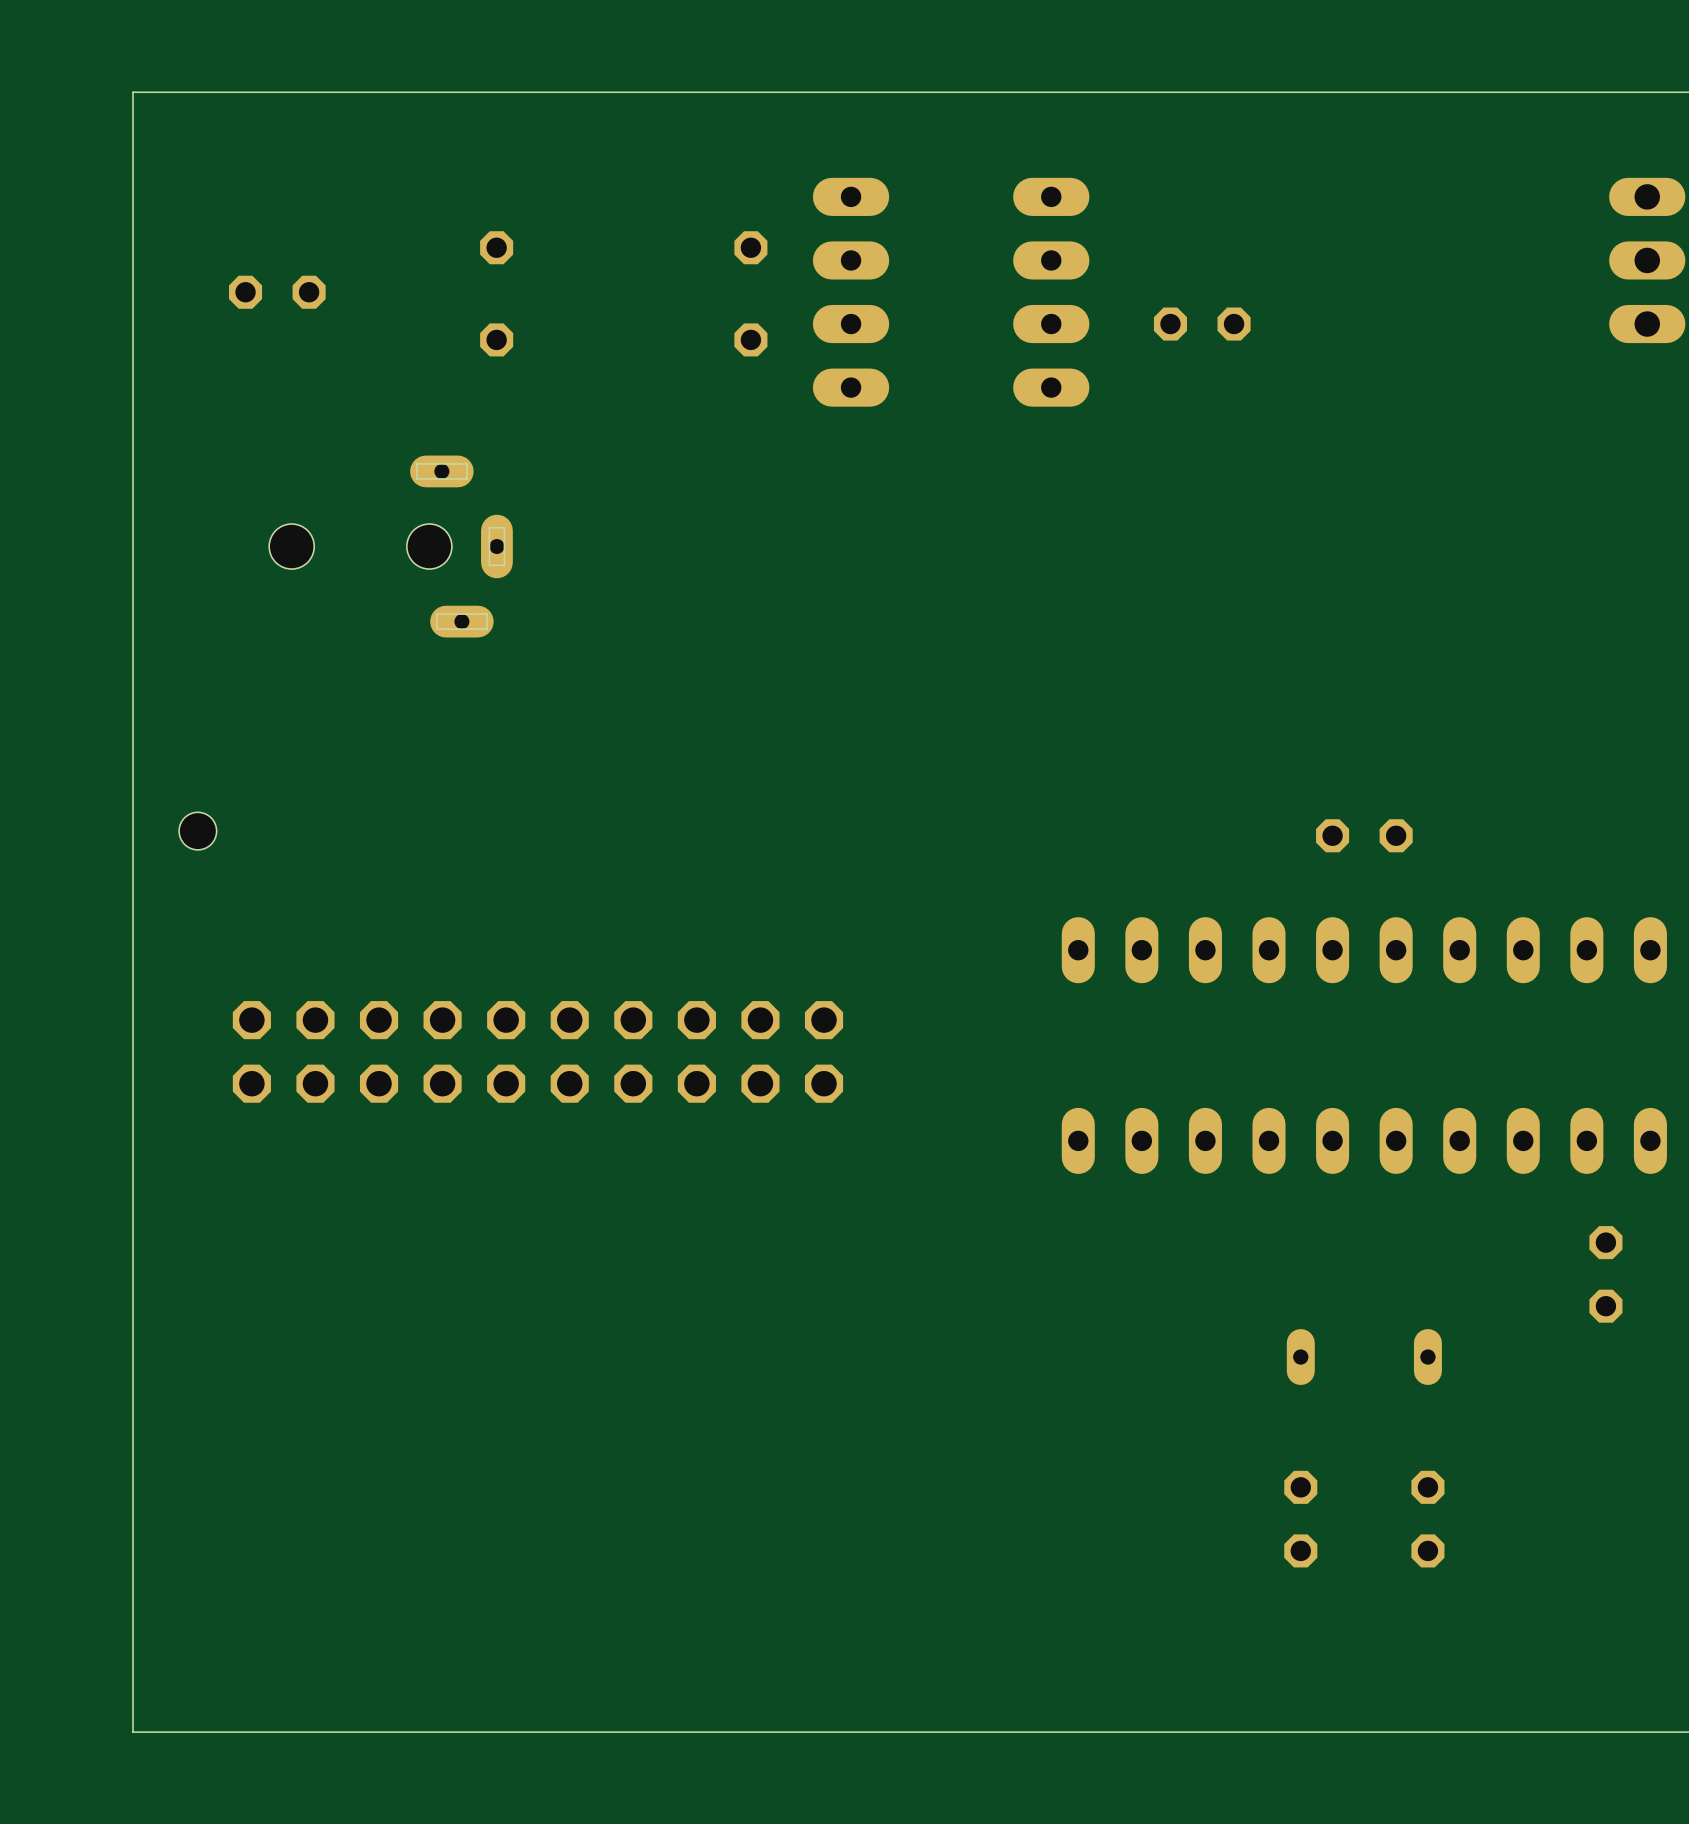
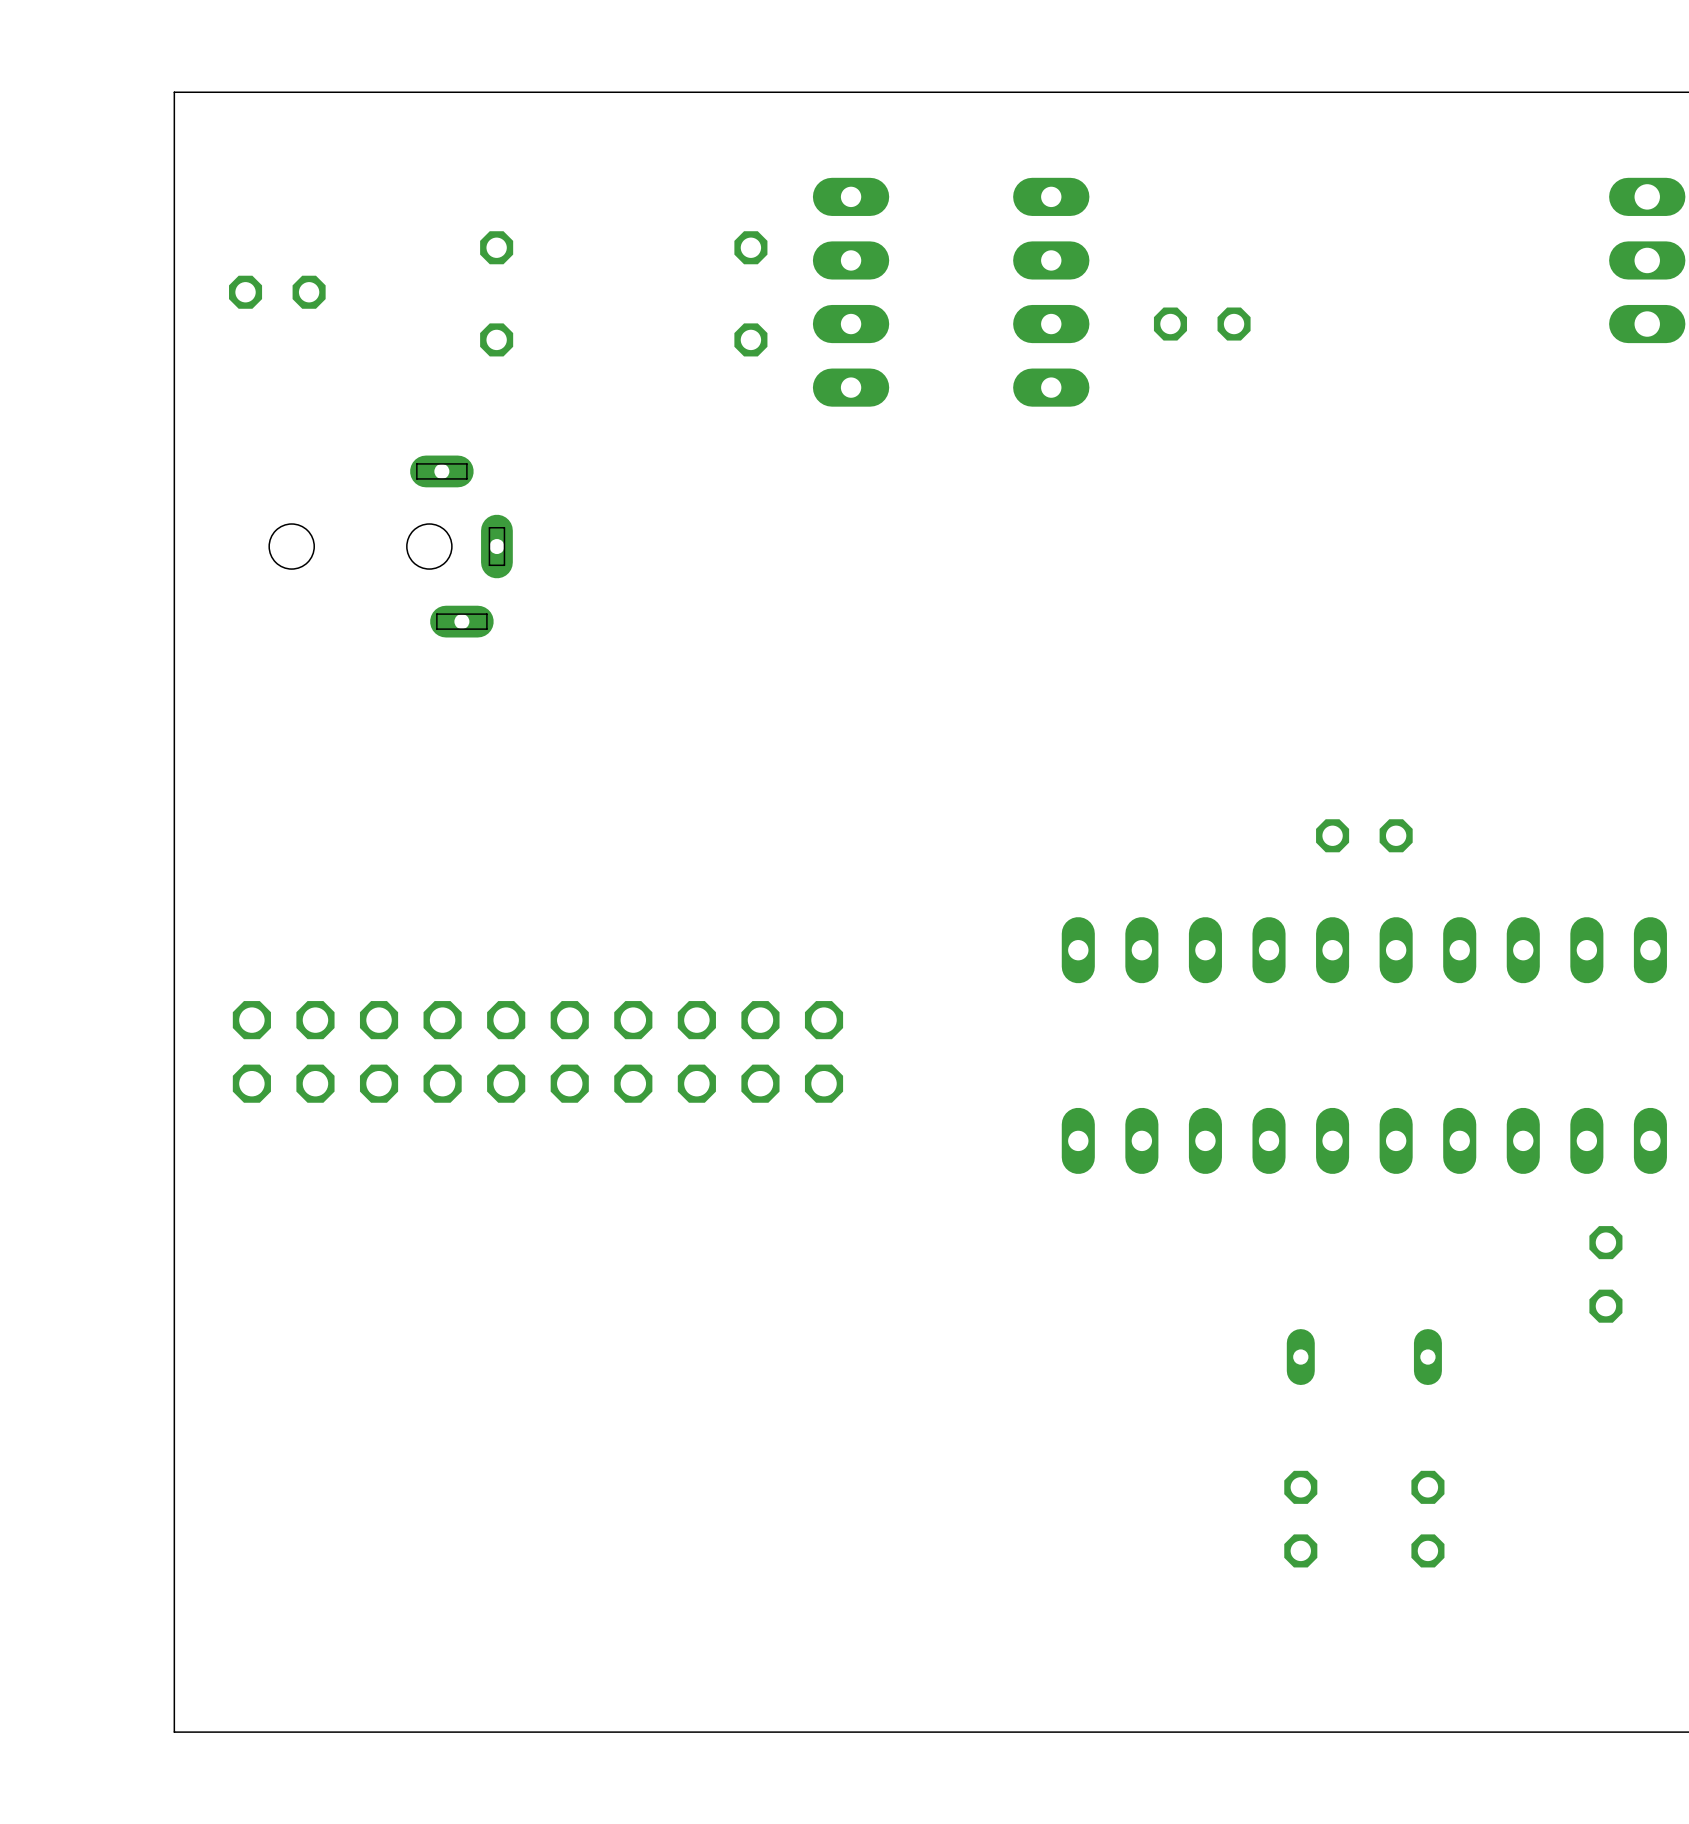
board edge: (174, 92) (133, 92) (133, 1732) (174, 1732) -> (174, 92) (174, 1732)
hole: (197, 831) -> none

